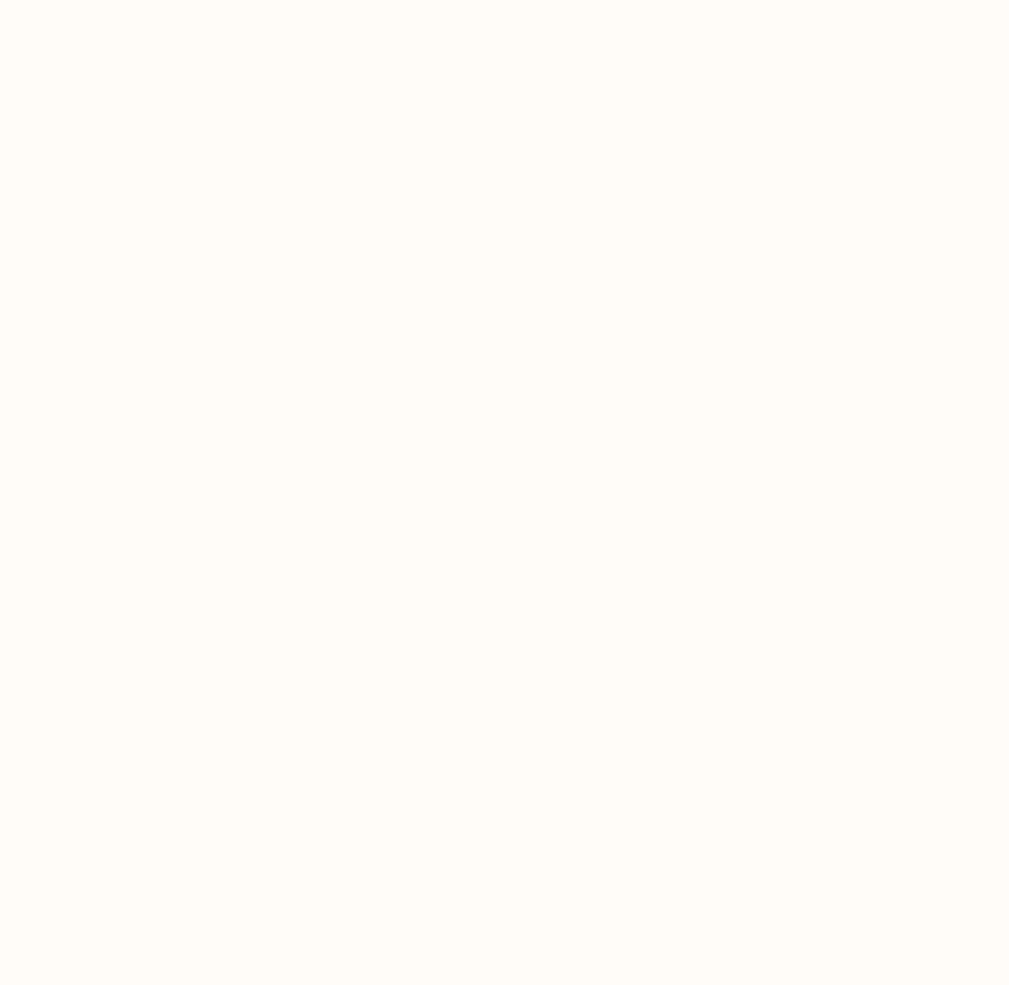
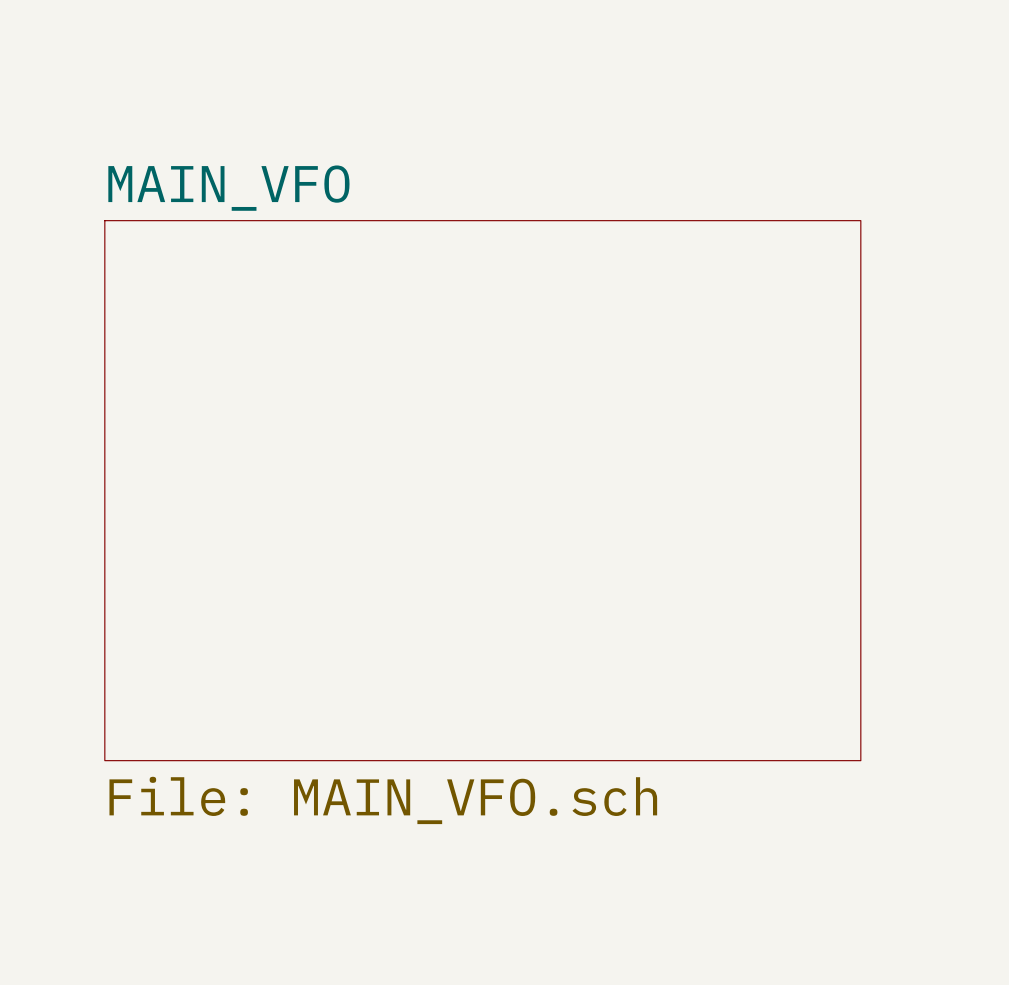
sheet MAIN_VFO: none -> File: MAIN_VFO.sch (482, 490)

